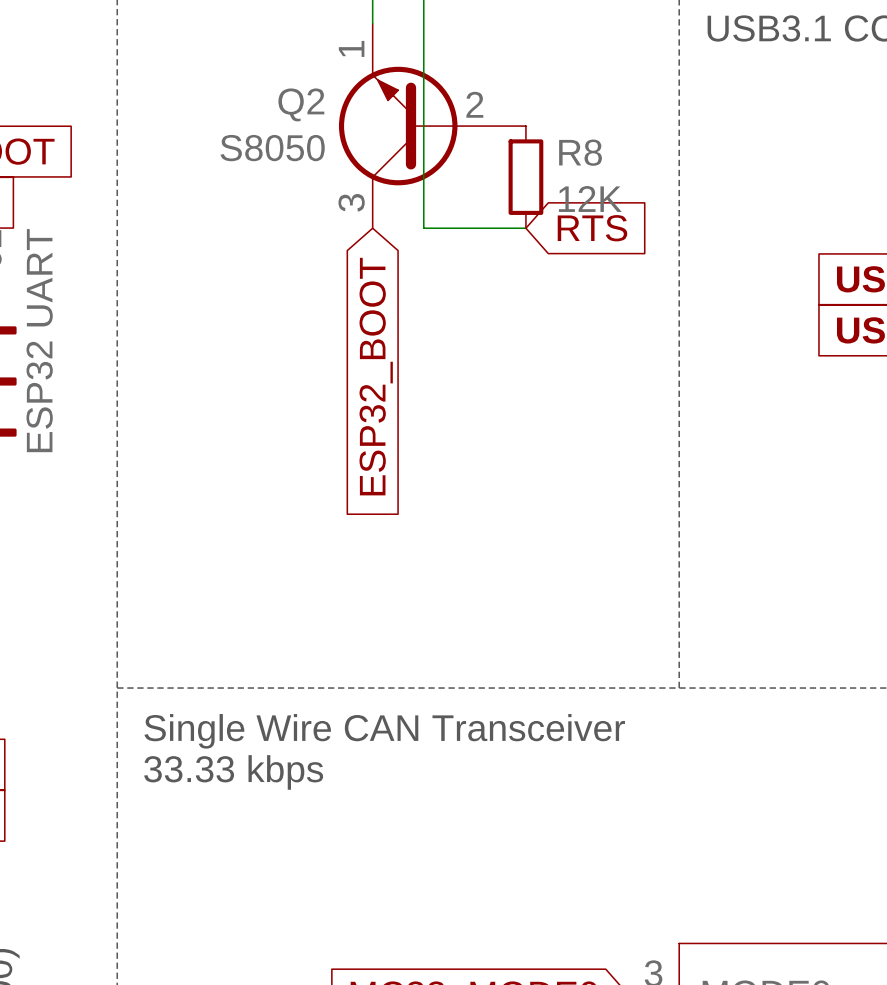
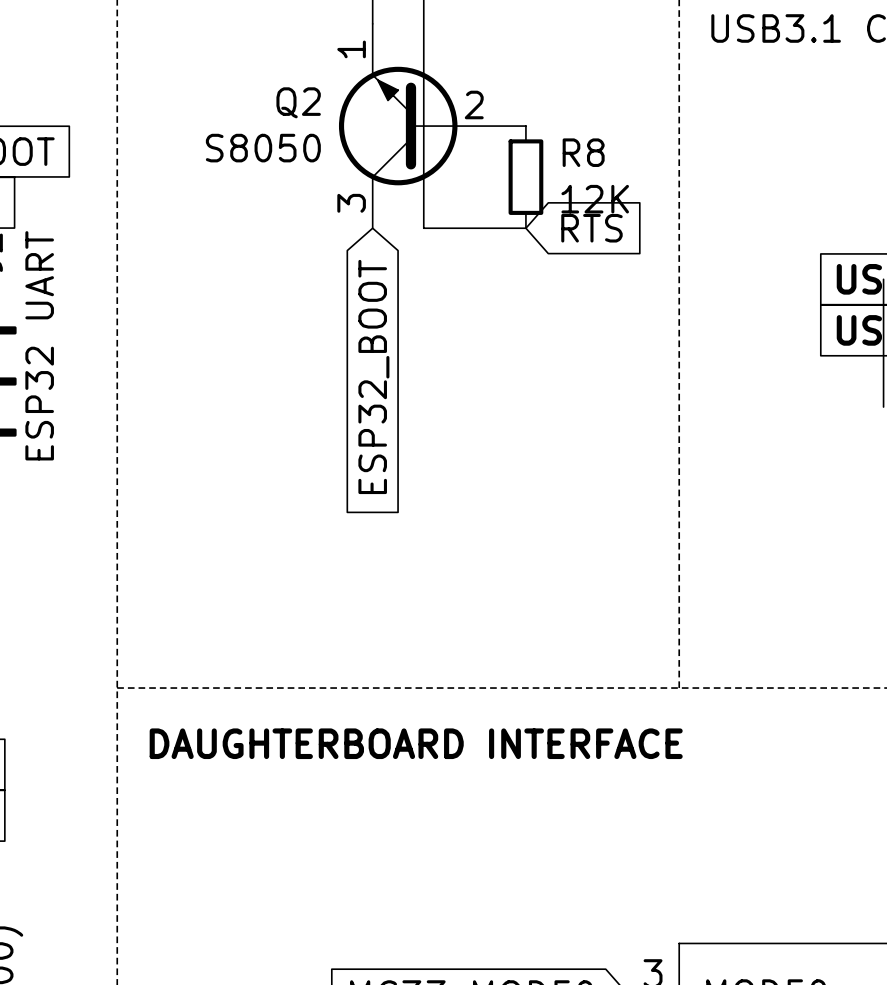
wire: none -> (883, 279) (883, 407)
text: Single Wire CAN Transceiver (384, 731) -> none
text: none -> DAUGHTERBOARD INTERFACE (416, 743)
text: 33.33 kbps (233, 772) -> none

